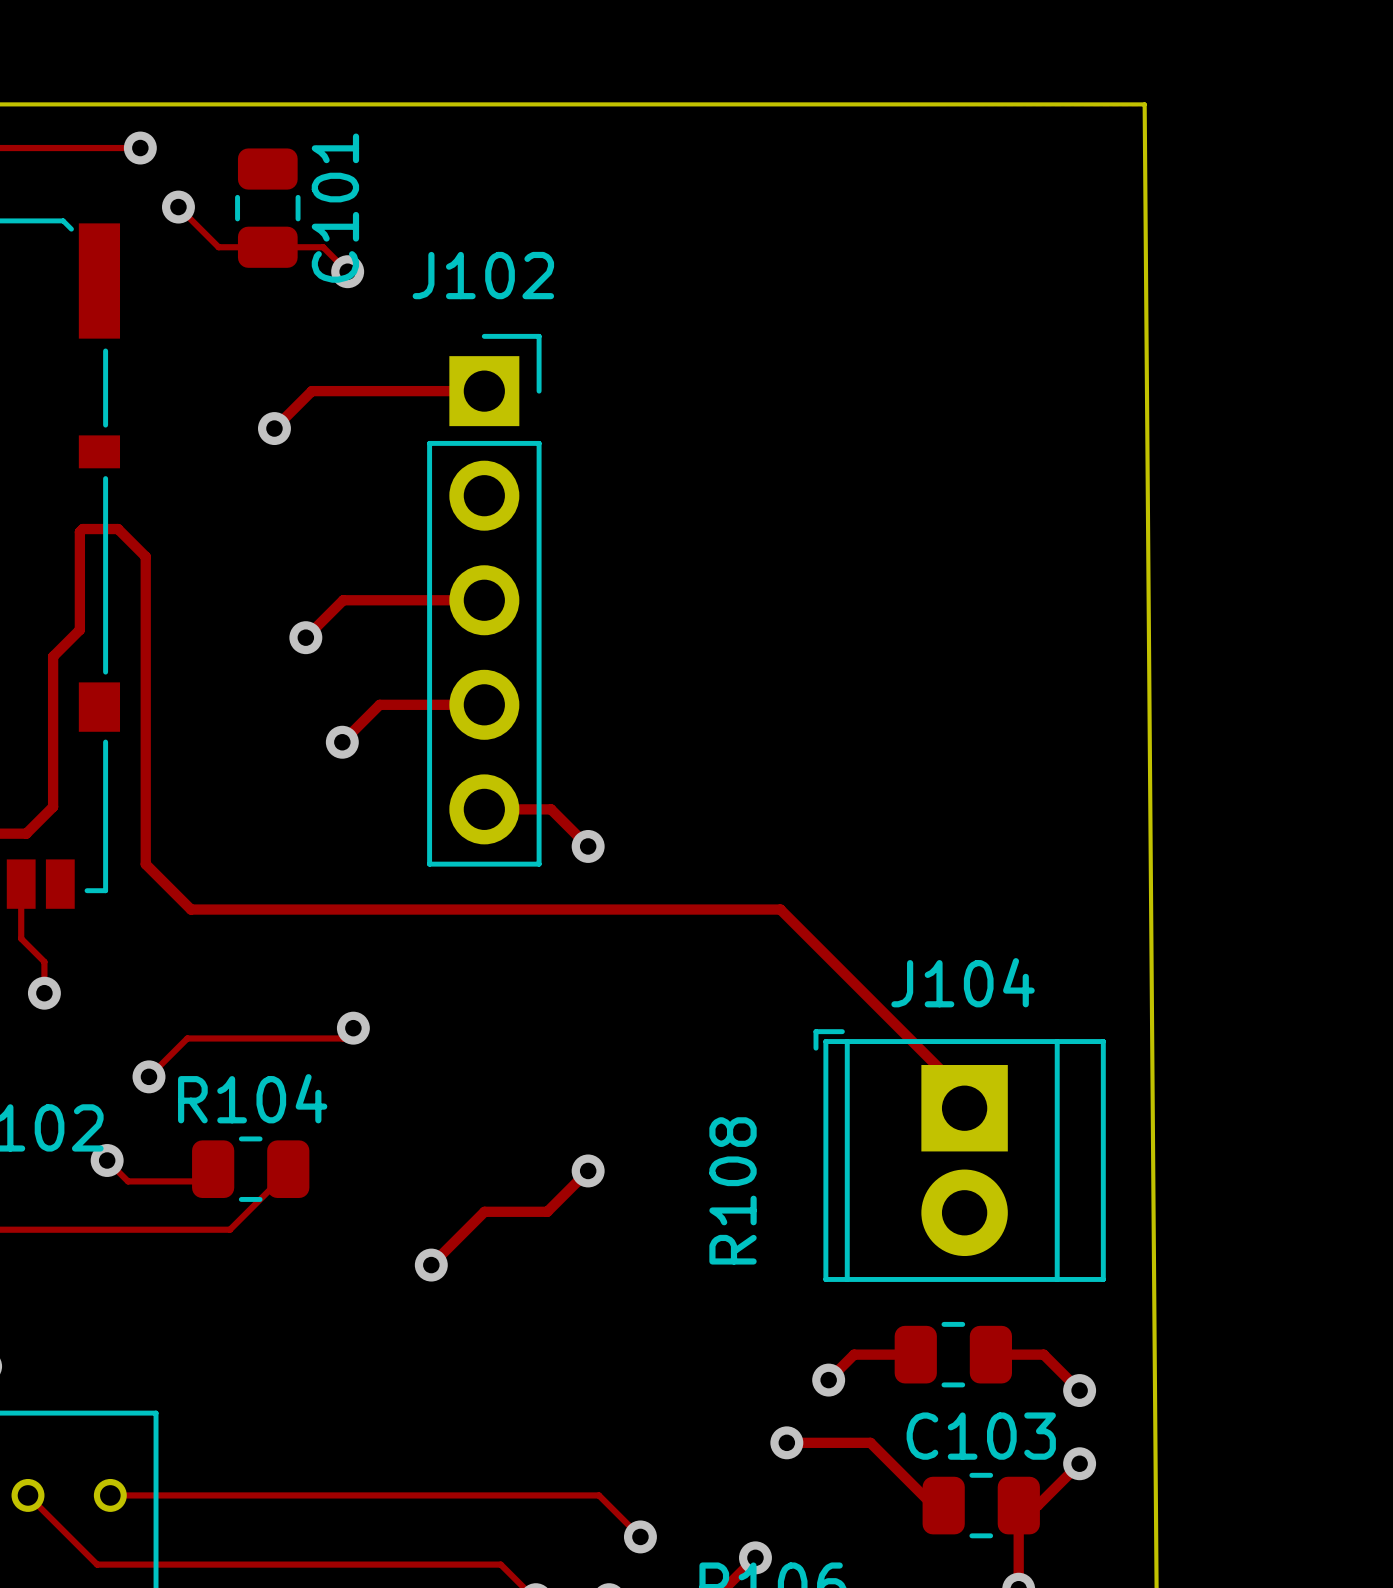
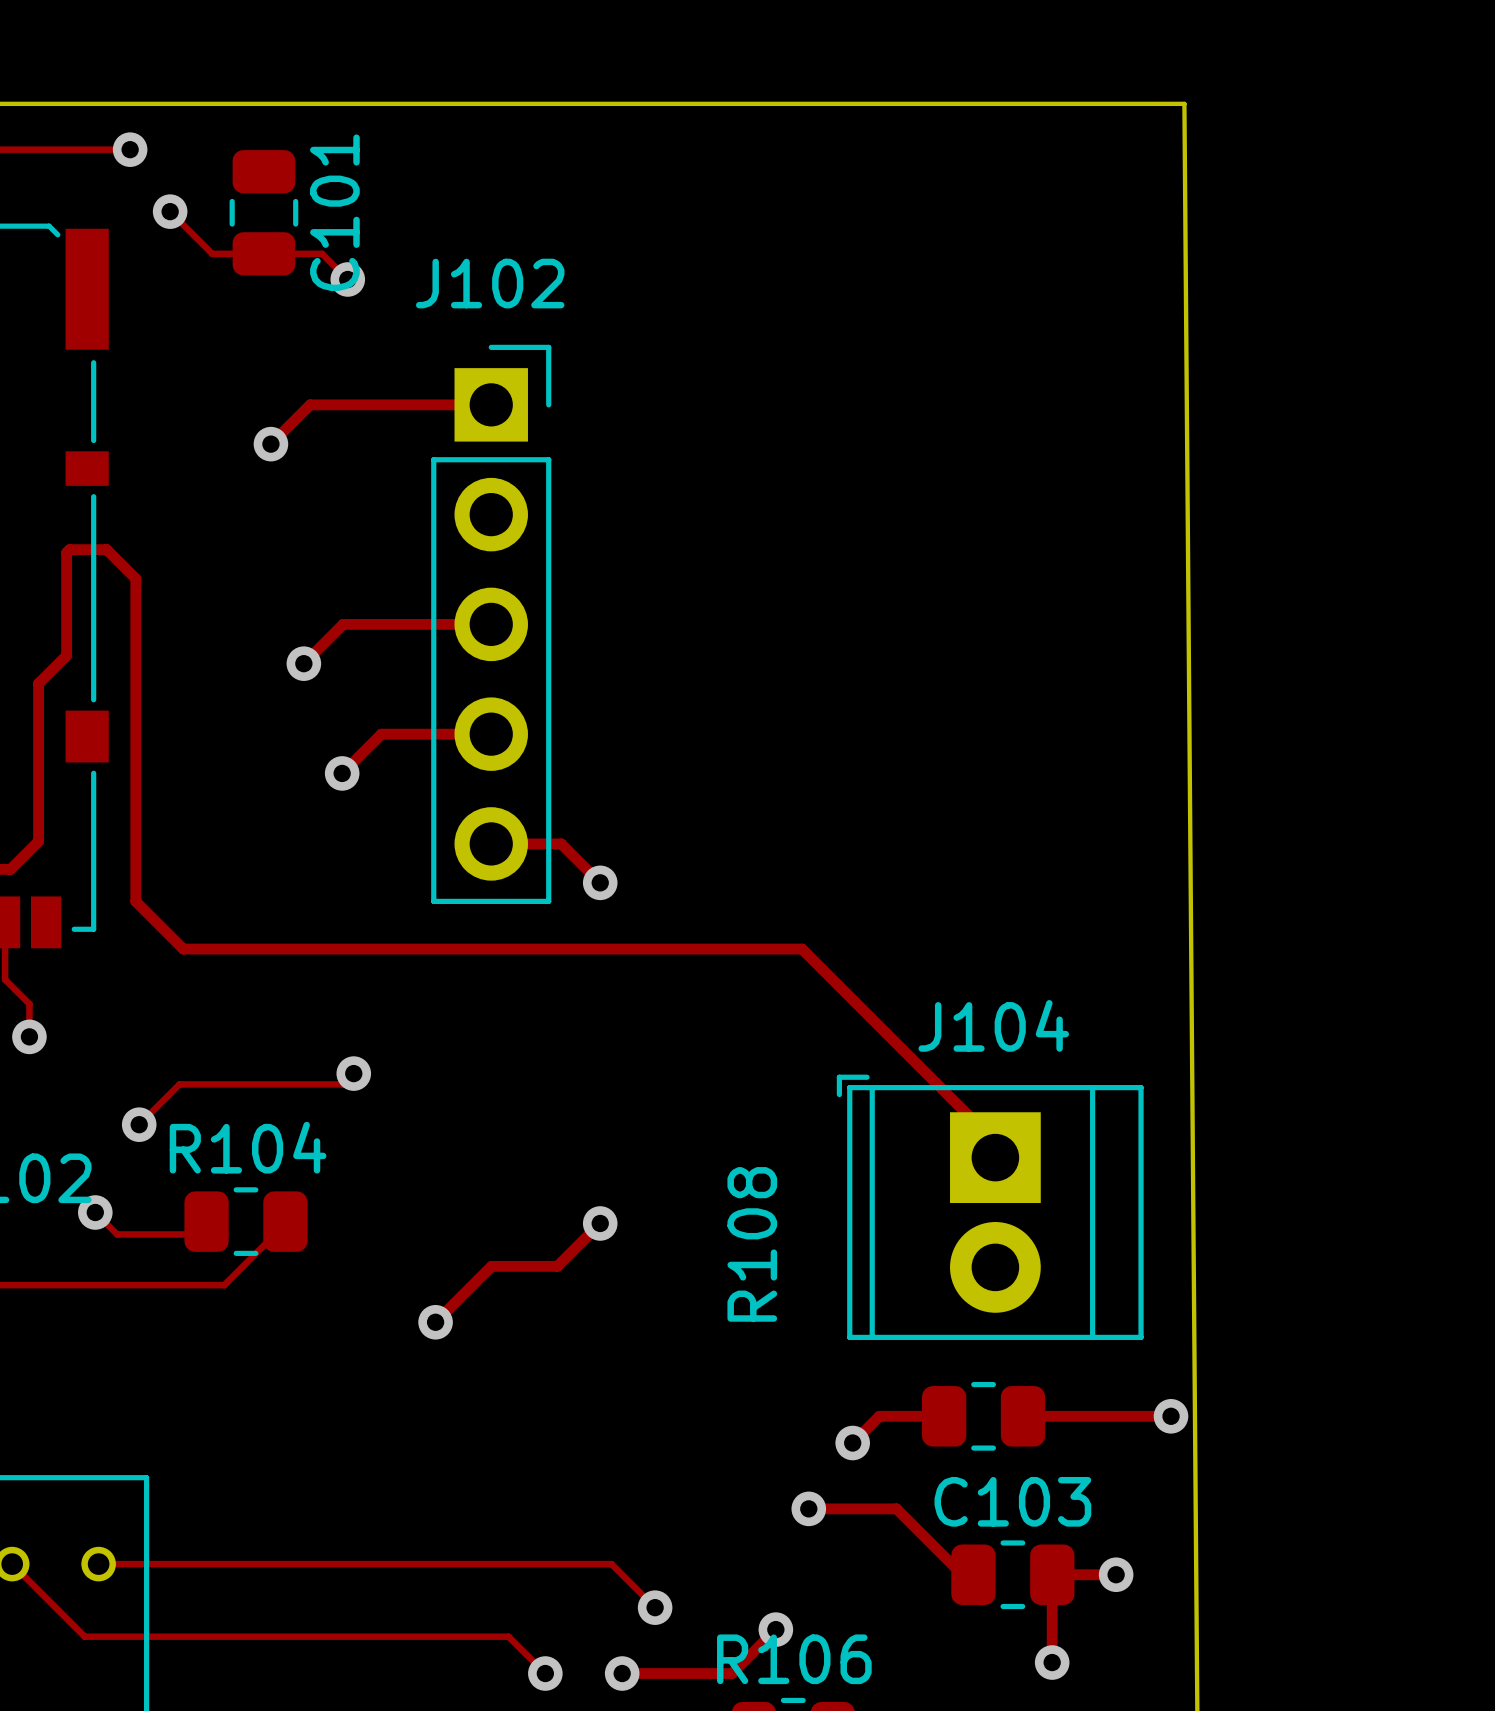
track: (1043, 1354) (1079, 1390) -> (1078, 1416) (1171, 1416)
via: none -> (1171, 1416)
via: (1079, 1390) -> none
track: (1079, 1463) (1037, 1505) -> (1116, 1574) (1072, 1574)
via position: (1079, 1463) -> (1116, 1574)

